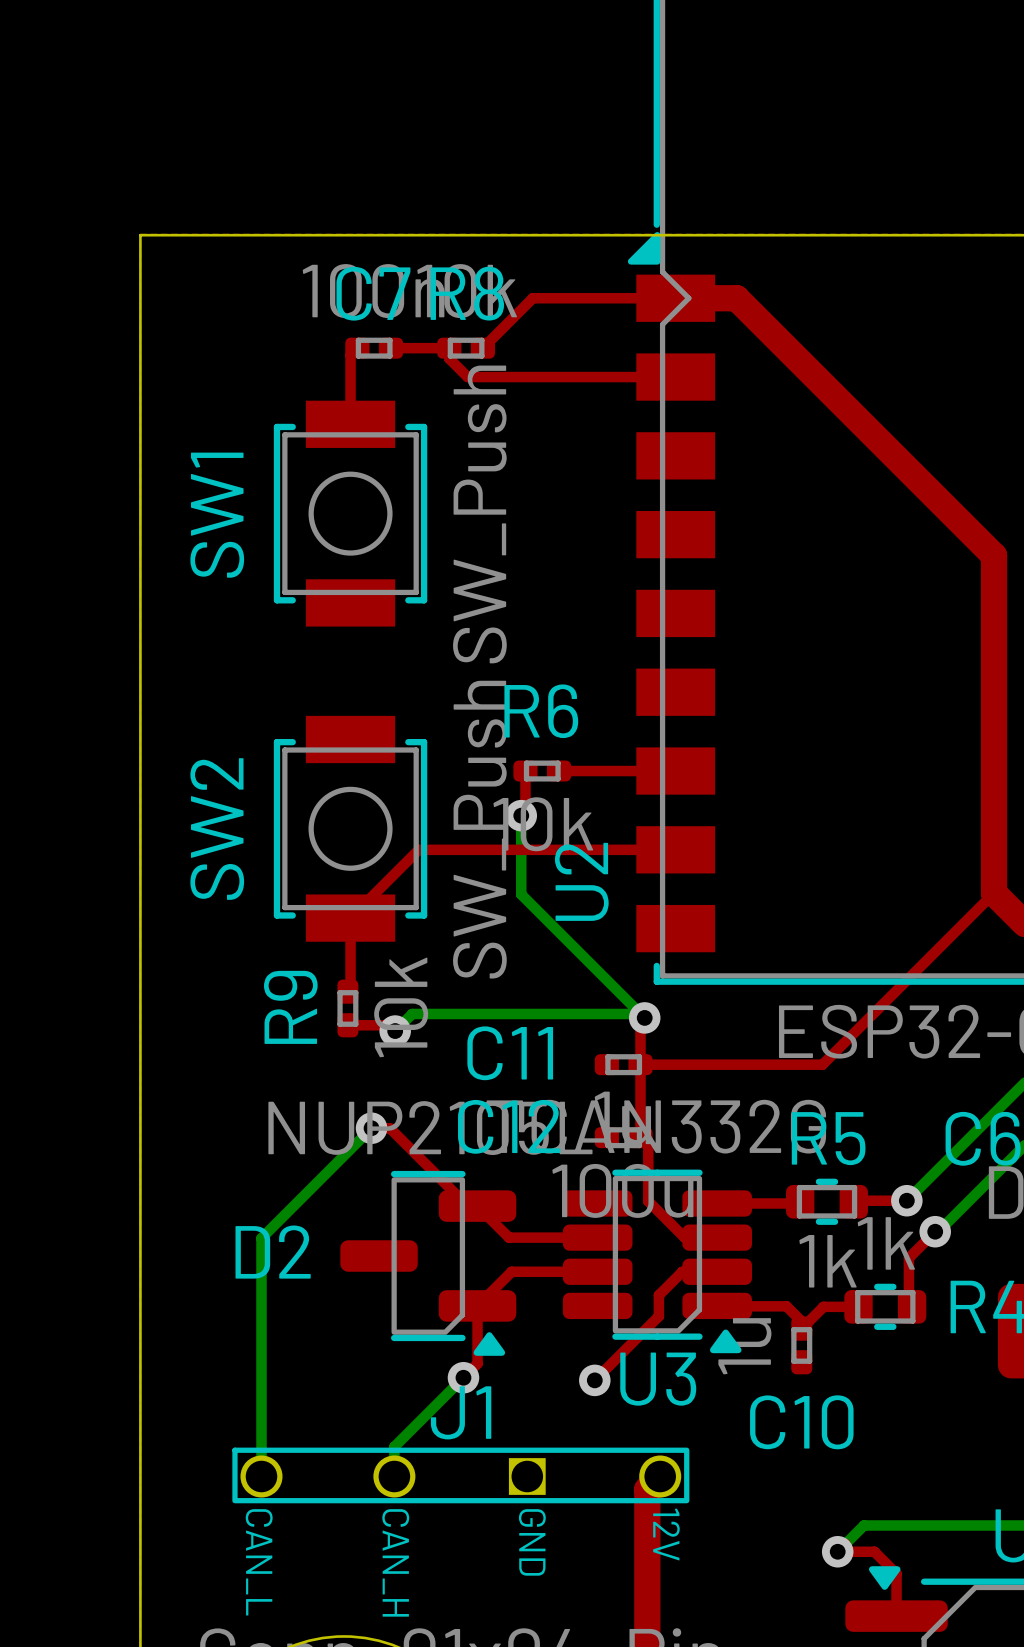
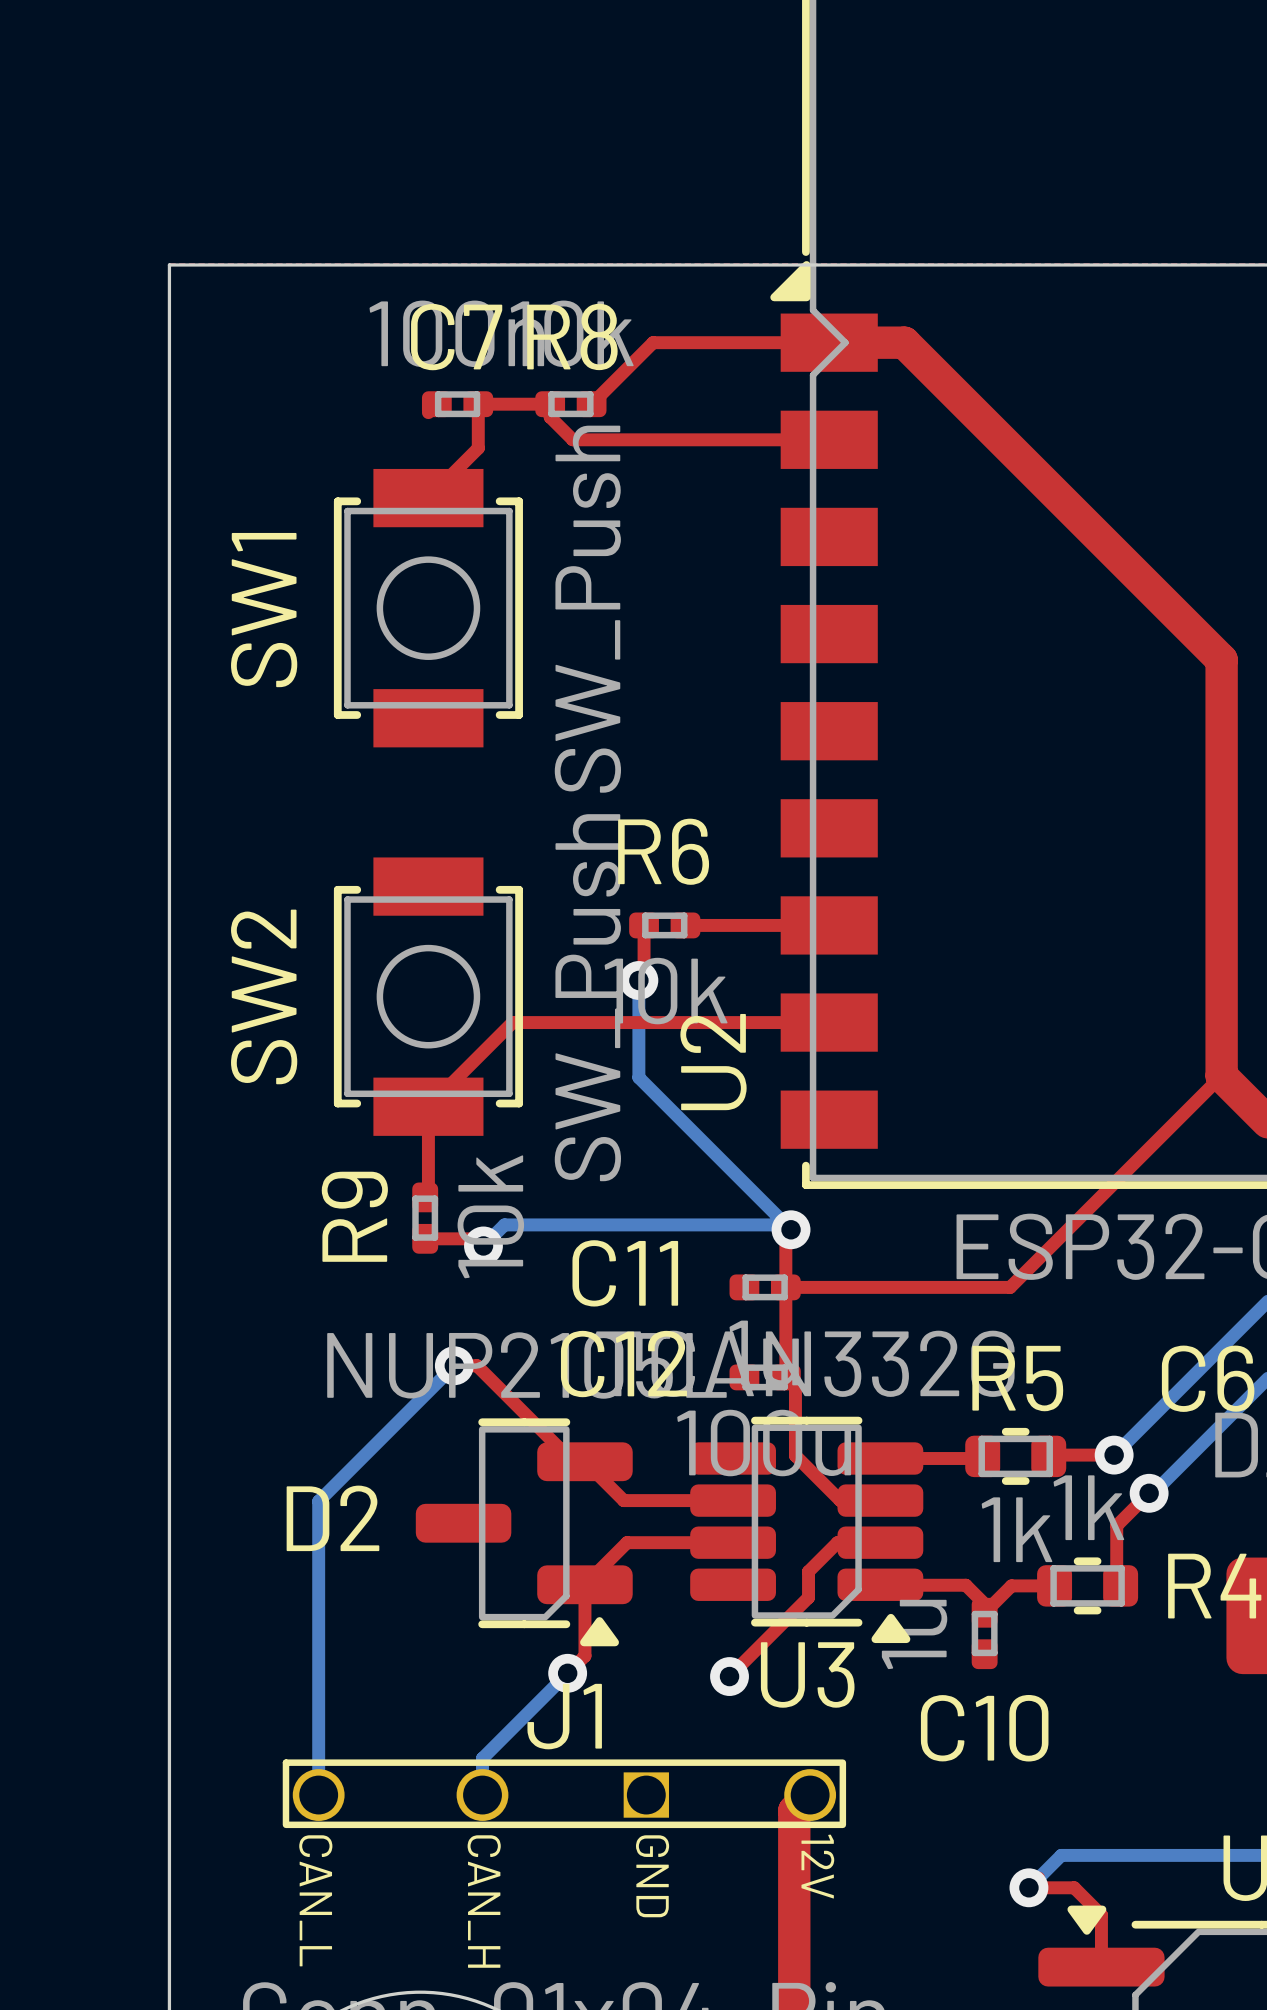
top track: (350, 354) (350, 424) -> (478, 404) (478, 448) (428, 498)

